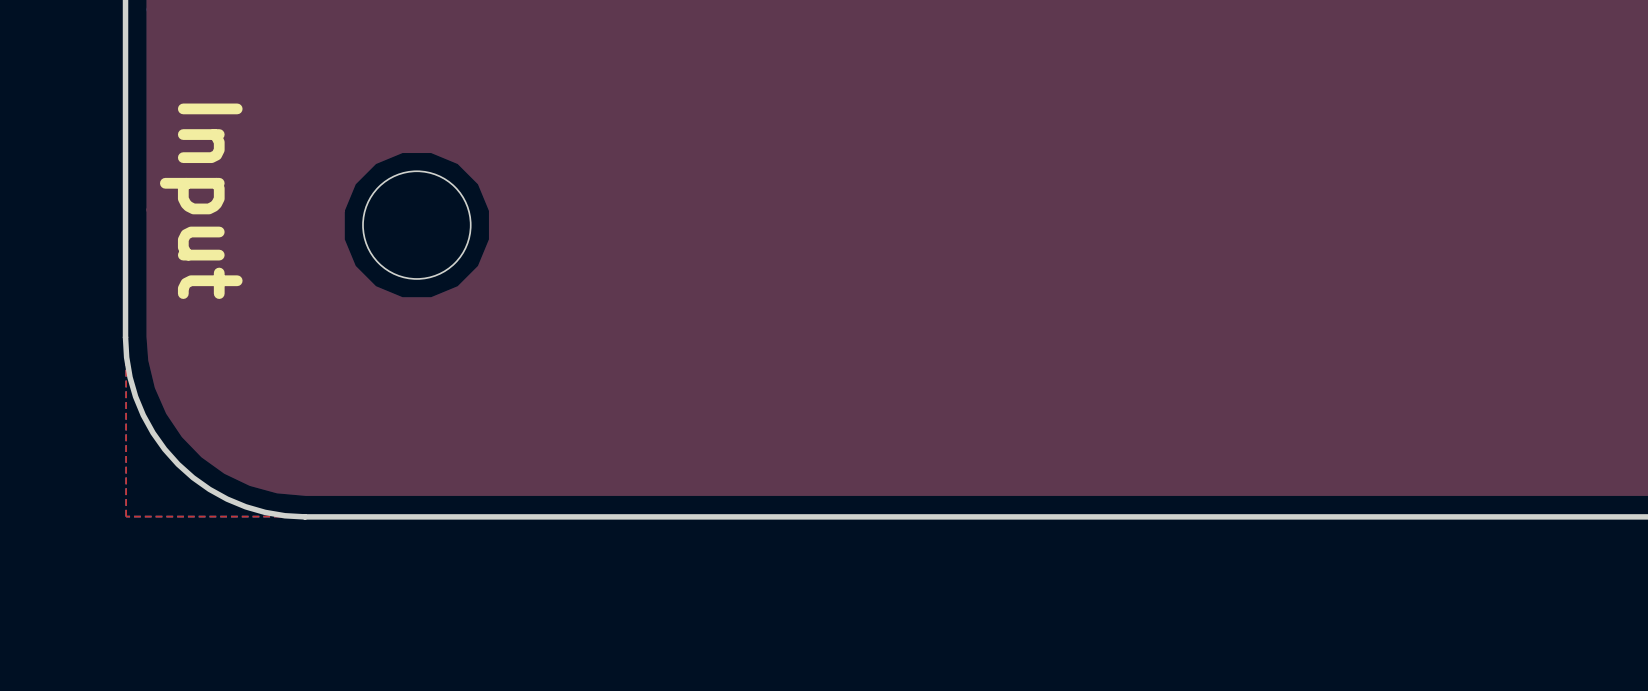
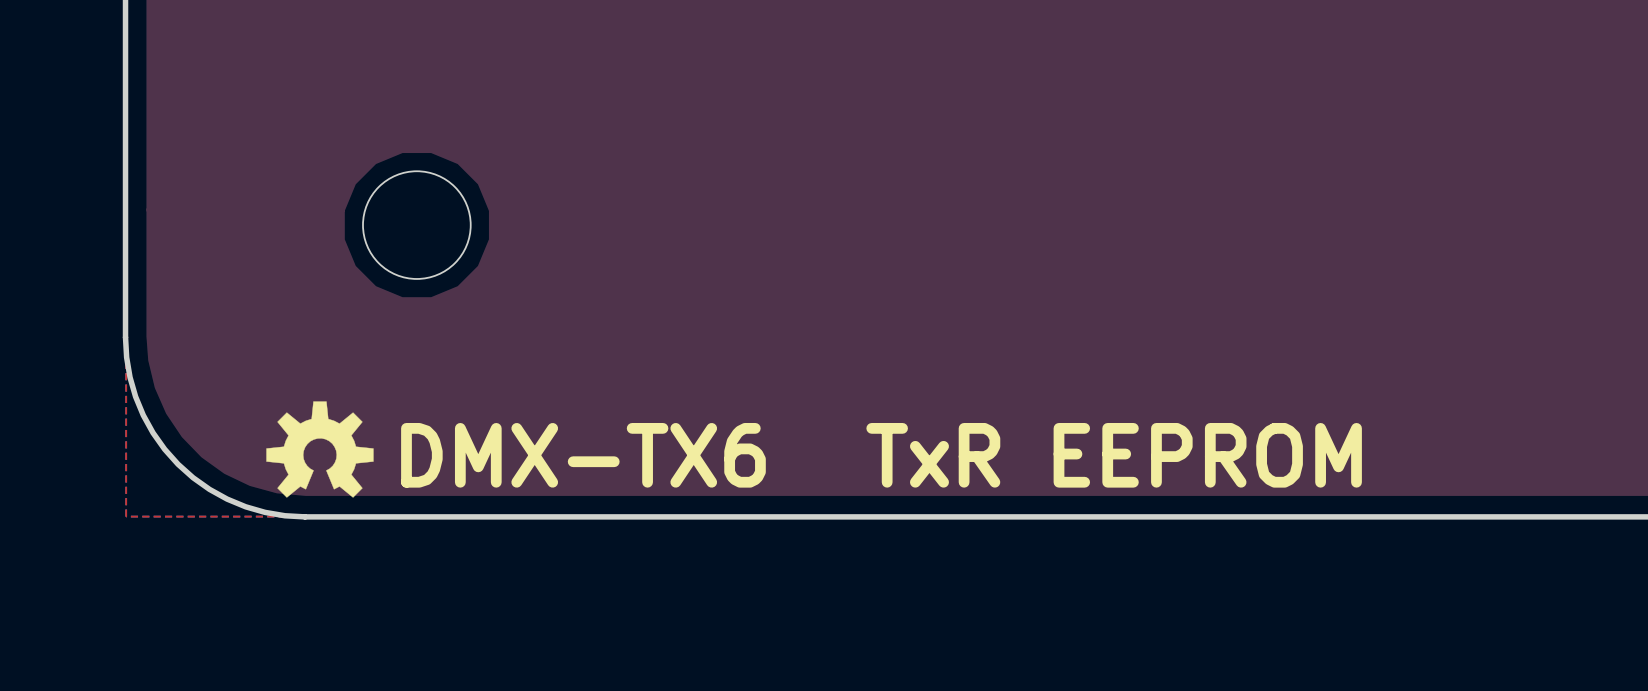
text: Input (201, 201) -> none
drawing: none -> [266, 401, 374, 498]
text: none -> DMX-TX6 (583, 455)
text: none -> TxR EEPROM (1114, 455)

